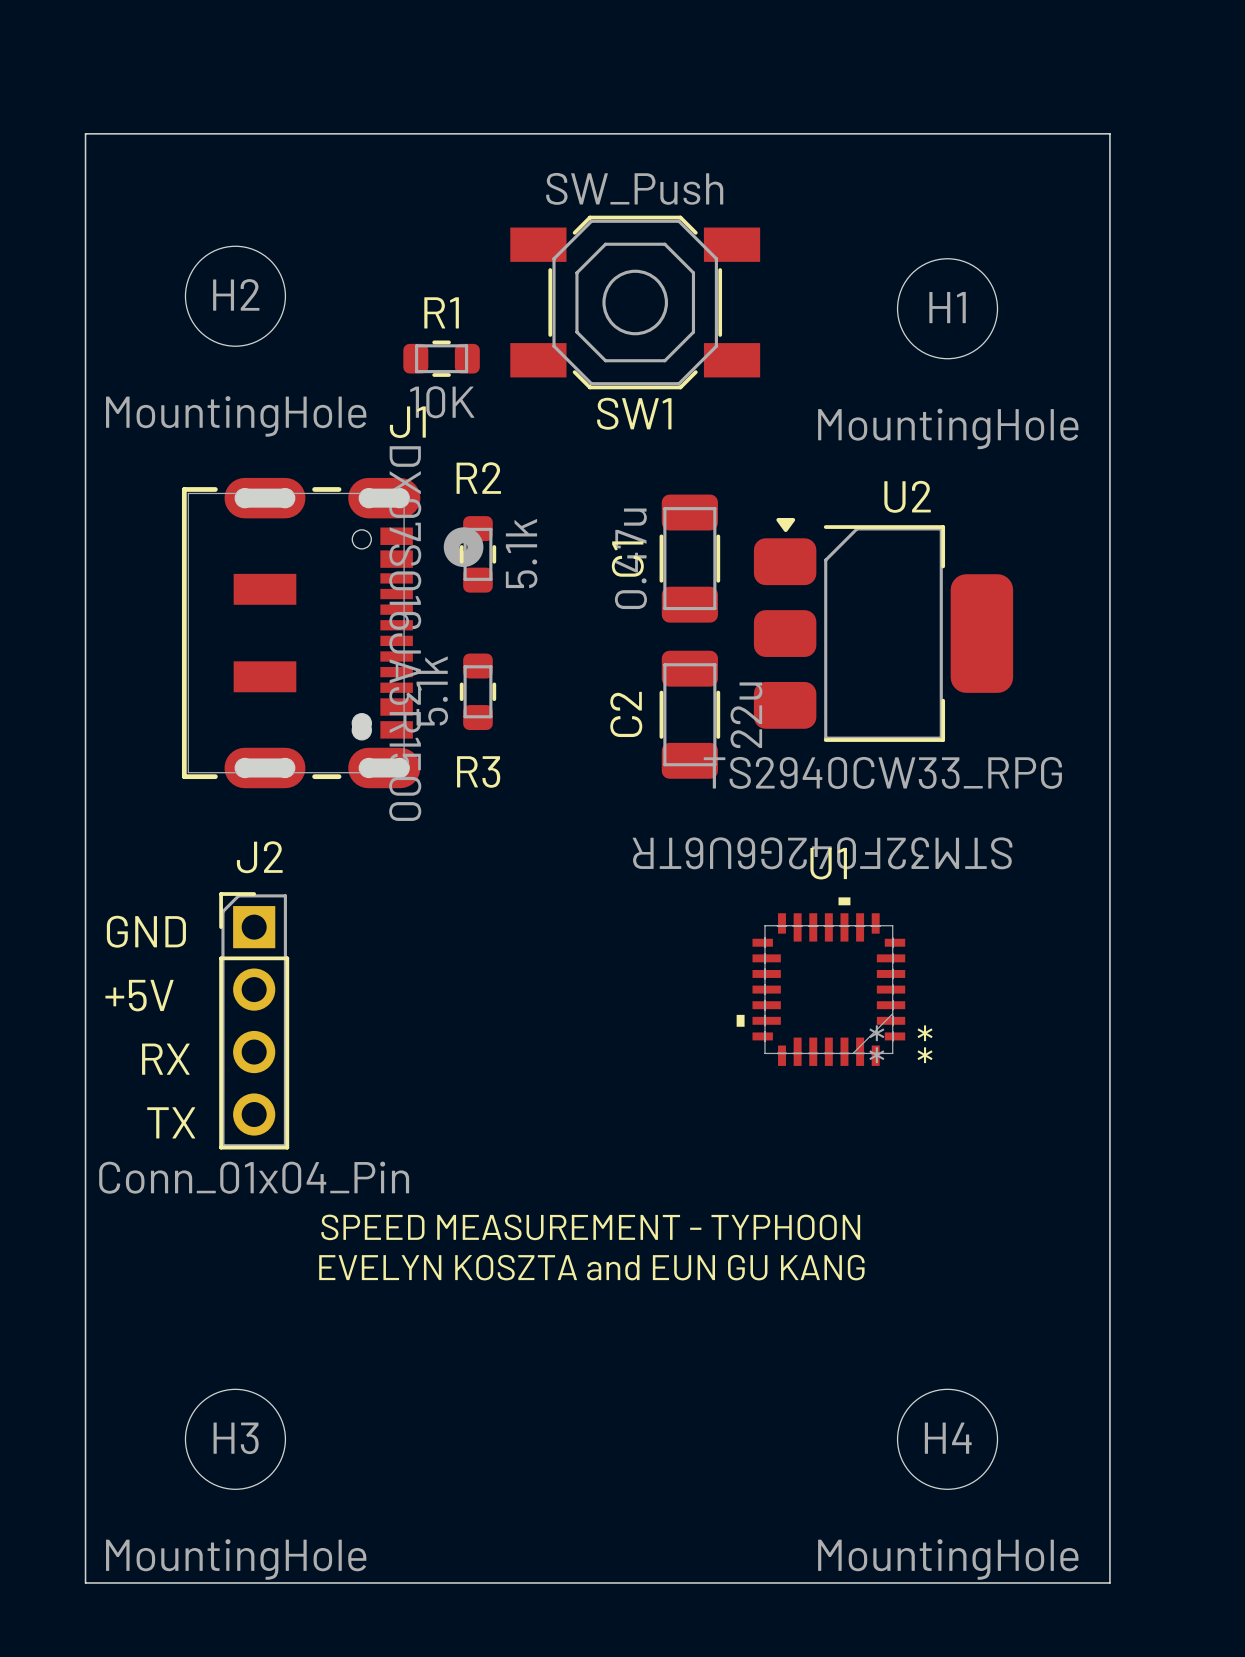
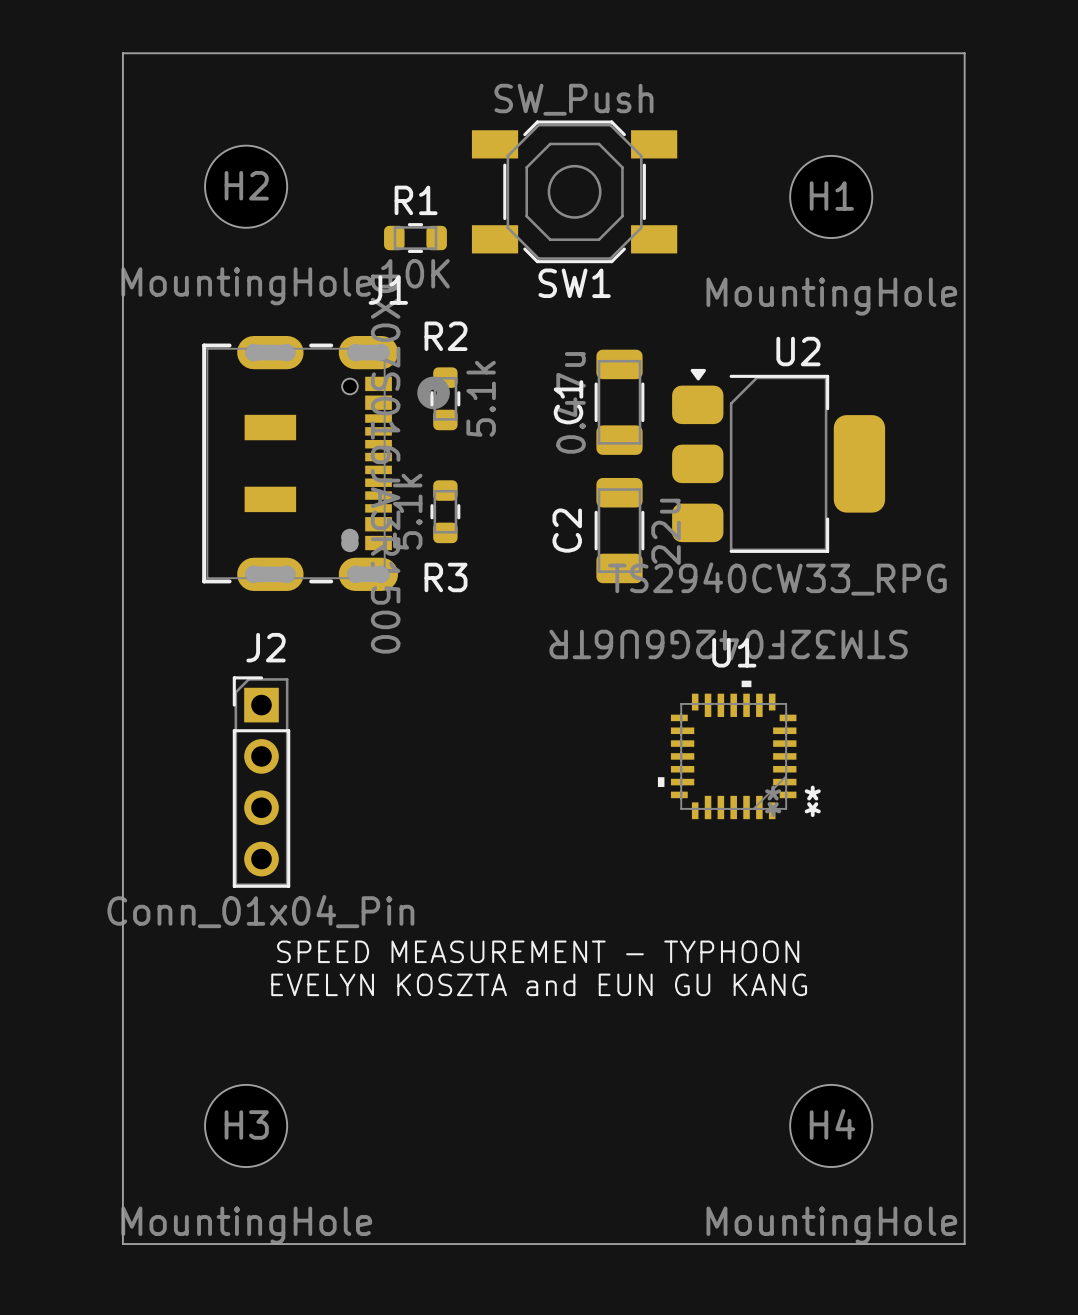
text: GND (146, 931) -> none
text: +5V (139, 995) -> none
text: RX (165, 1059) -> none
text: TX (171, 1122) -> none

